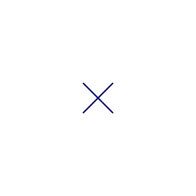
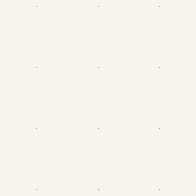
no-connect mark: (98, 98) -> none

